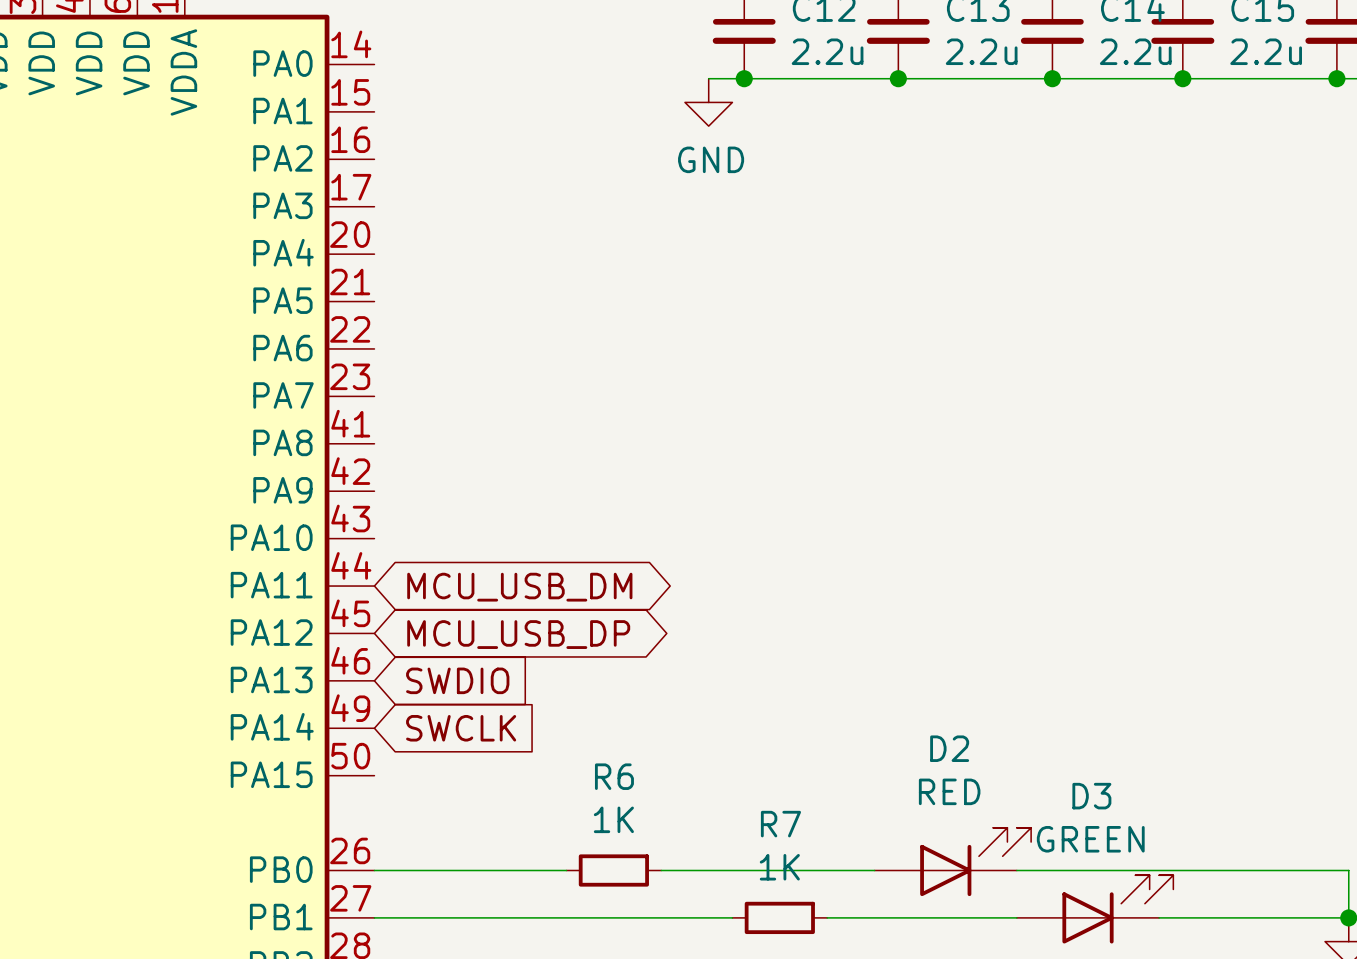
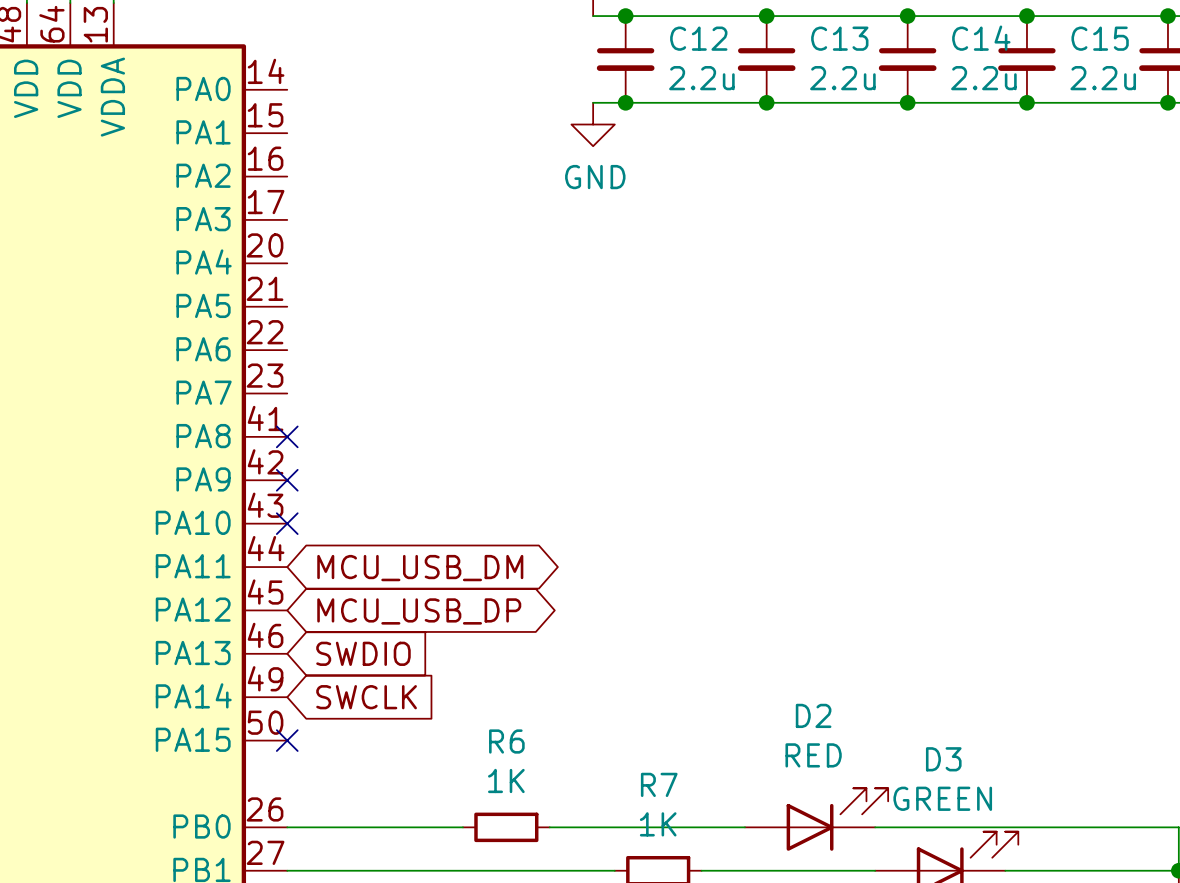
no-connect mark: none -> (287, 436)
no-connect mark: none -> (287, 480)
no-connect mark: none -> (287, 523)
no-connect mark: none -> (287, 740)

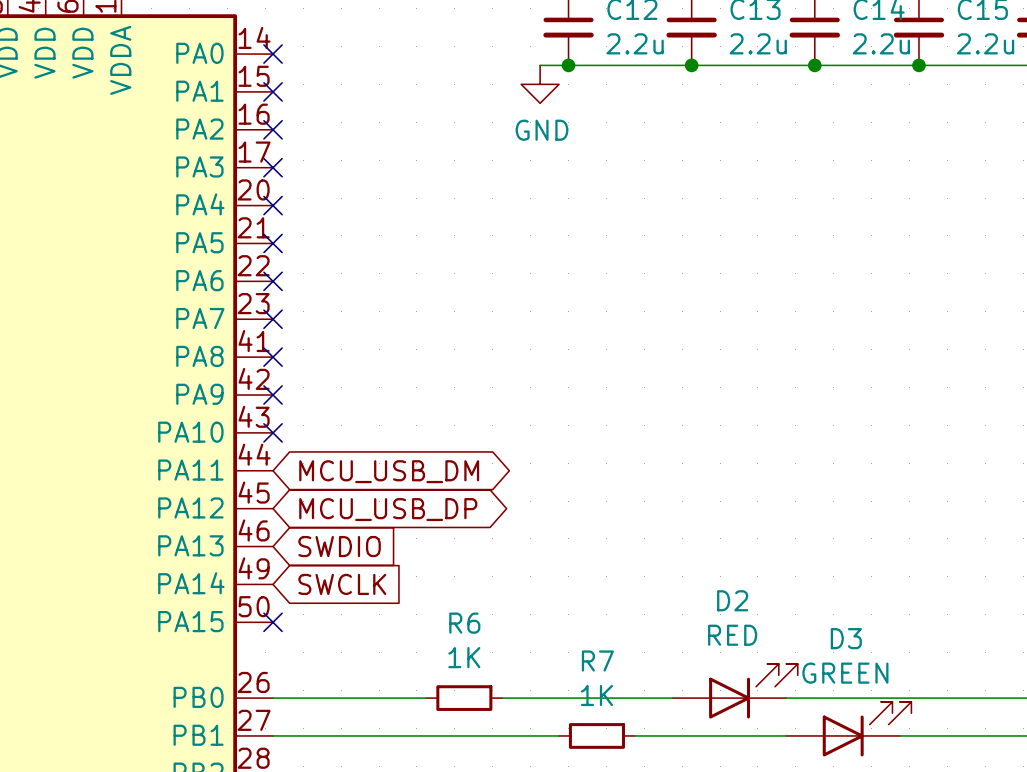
no-connect mark: none -> (273, 54)
no-connect mark: none -> (273, 91)
no-connect mark: none -> (273, 129)
no-connect mark: none -> (273, 167)
no-connect mark: none -> (273, 205)
no-connect mark: none -> (273, 243)
no-connect mark: none -> (273, 281)
no-connect mark: none -> (273, 319)

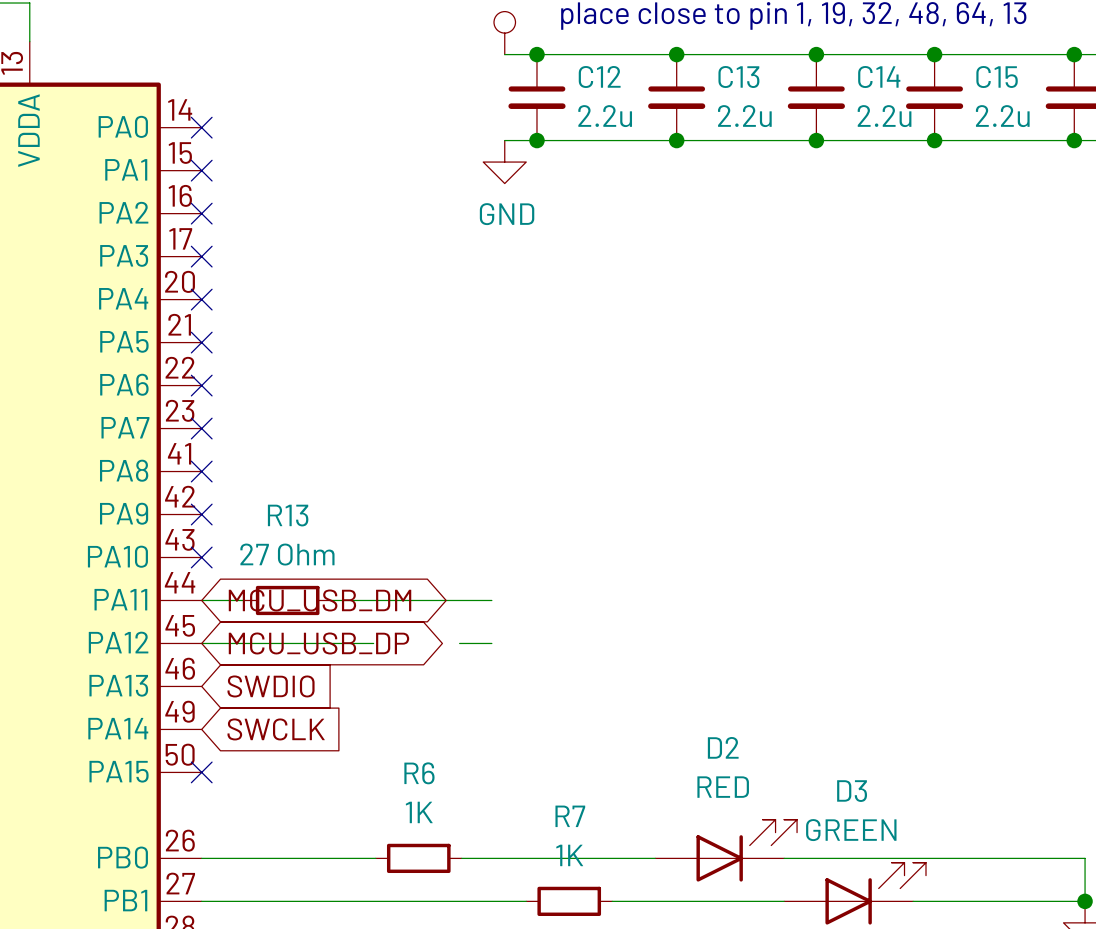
wire: none -> (201, 600) (244, 600)
R13: none -> 27 Ohm (287, 600)
wire: none -> (330, 600) (491, 600)
wire: none -> (201, 643) (373, 643)
wire: none -> (459, 643) (491, 643)

